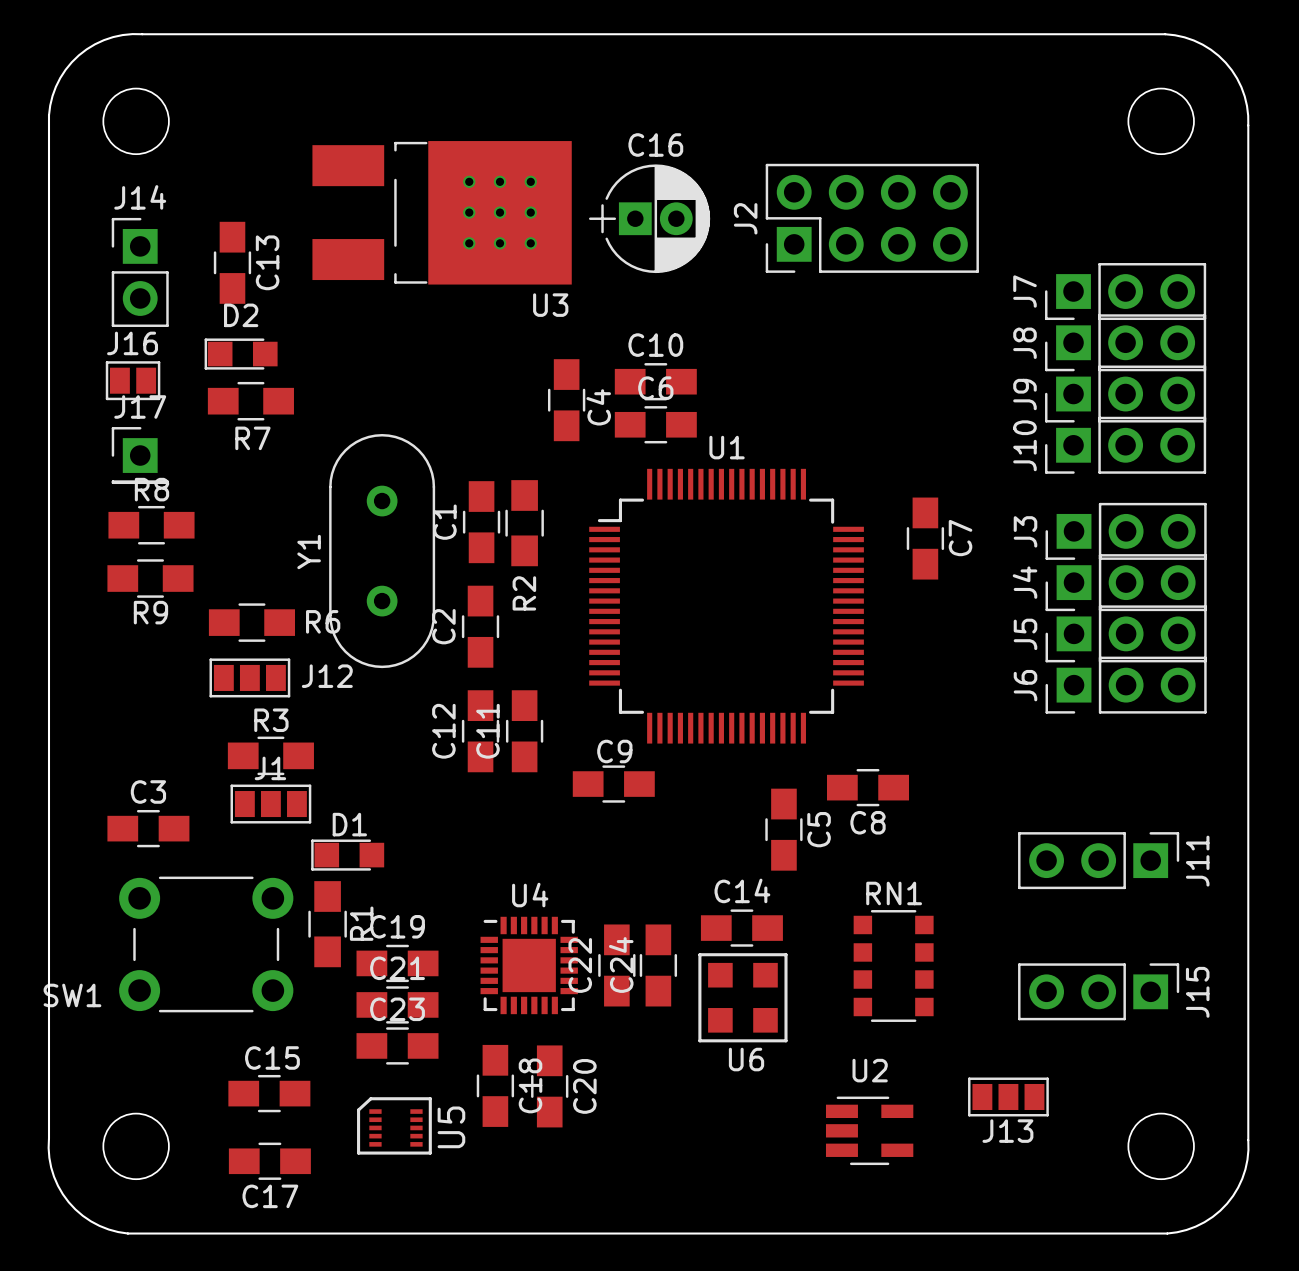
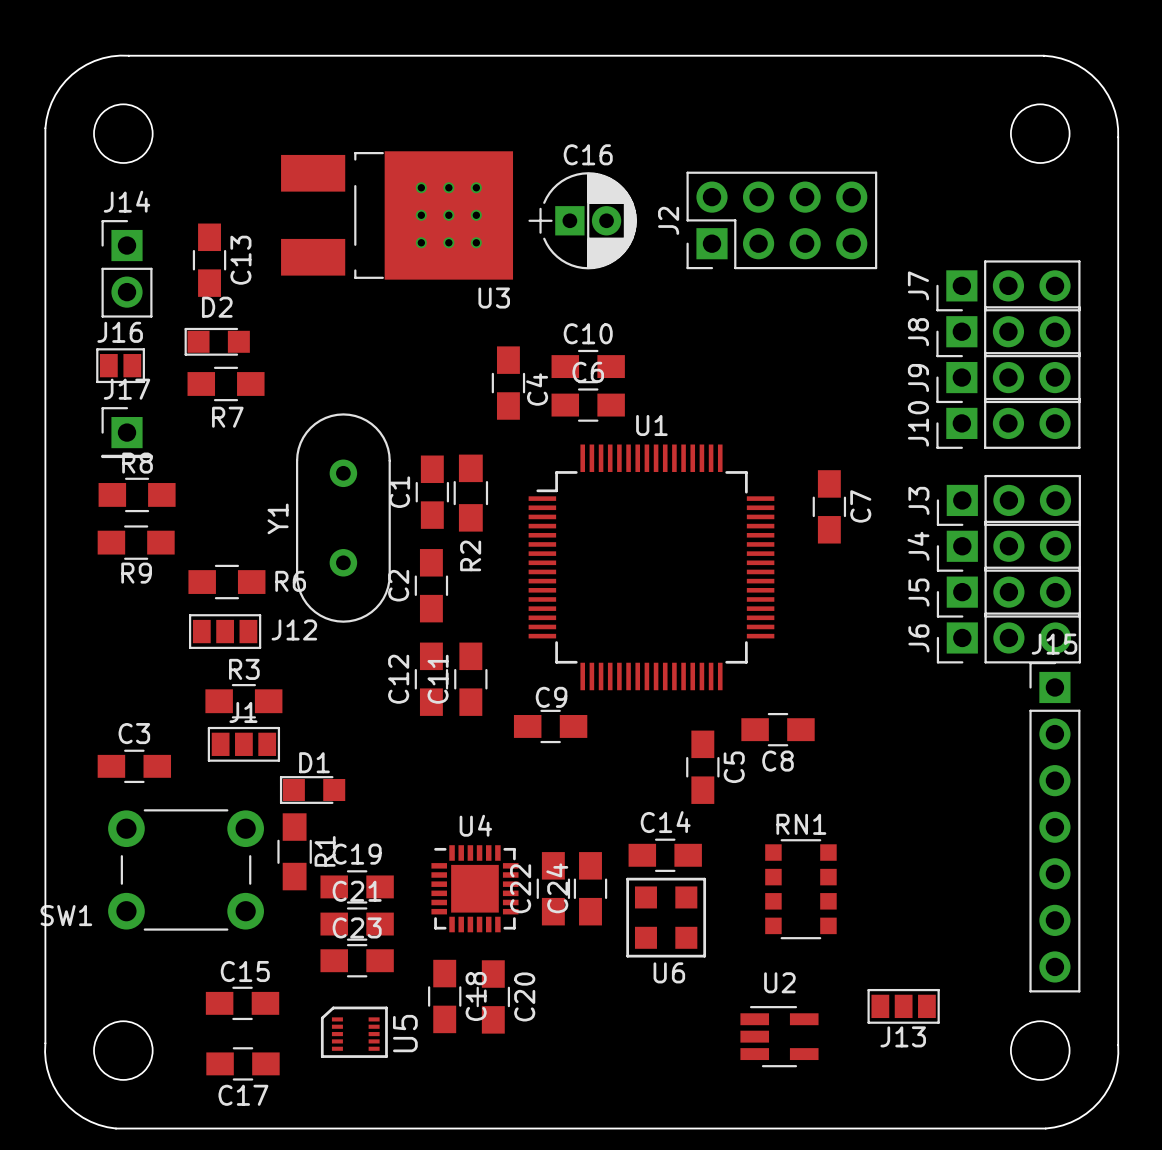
J11: (1098, 860) -> none
J15 footprint: [1018, 963, 1180, 1021] -> [1029, 662, 1081, 993]
J15 name position: J15 (1197, 992) -> J15 (1054, 644)

